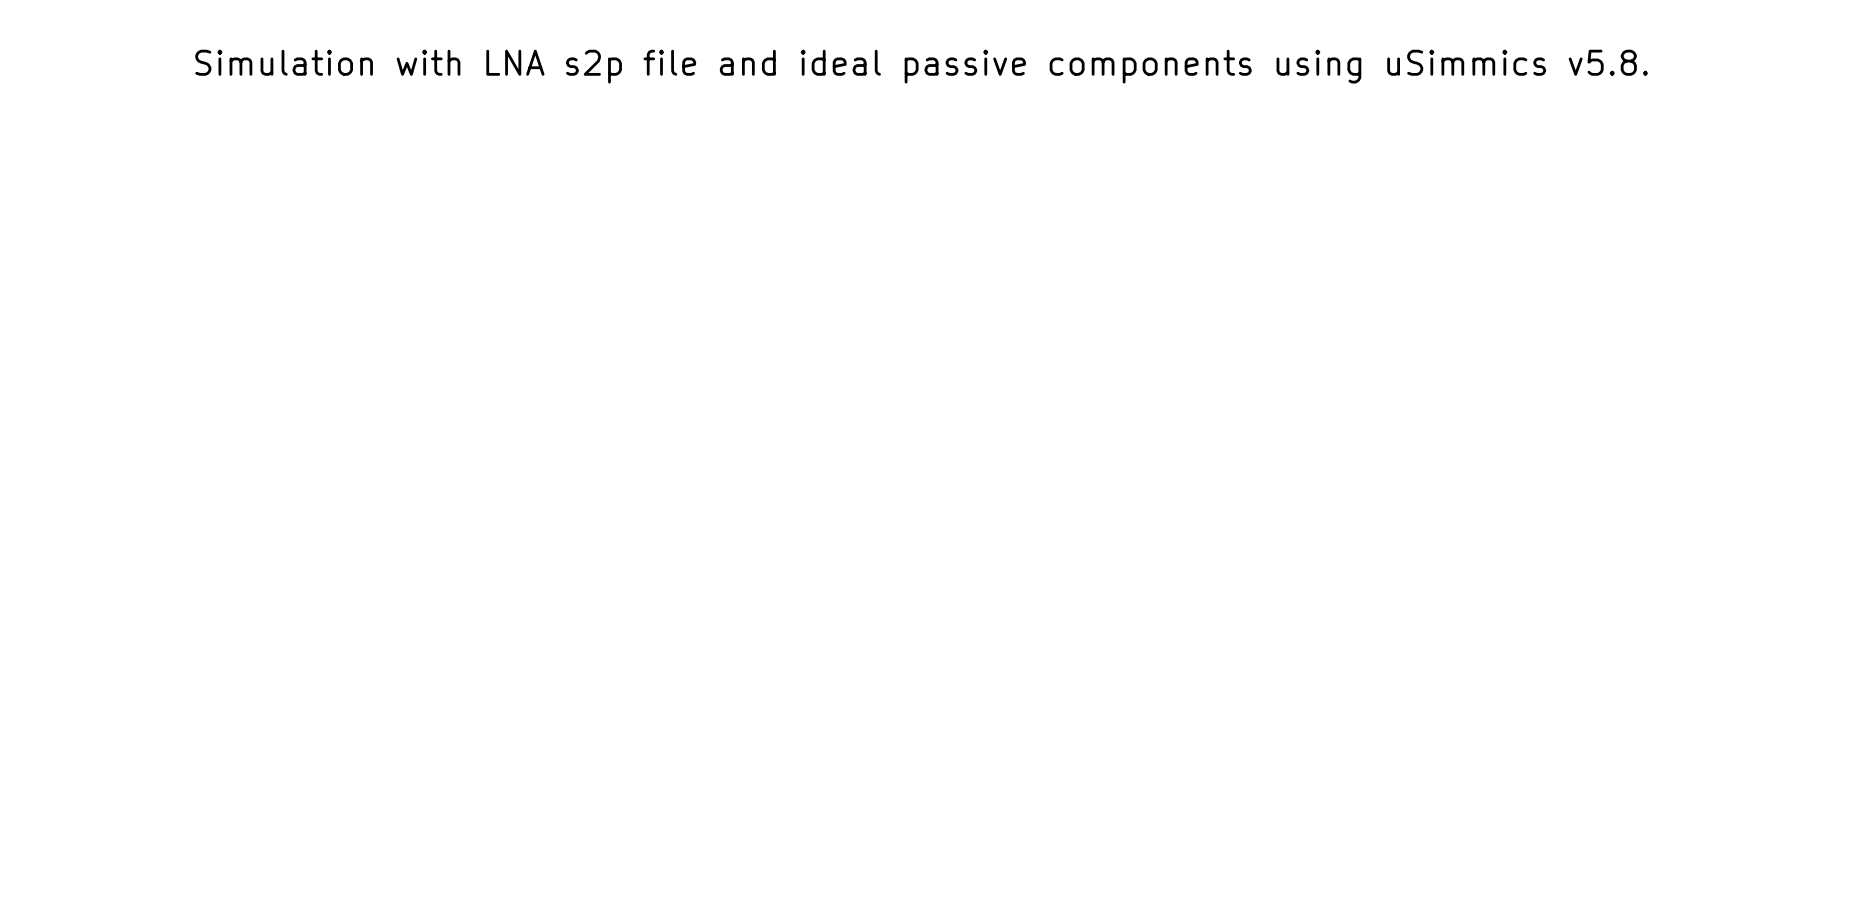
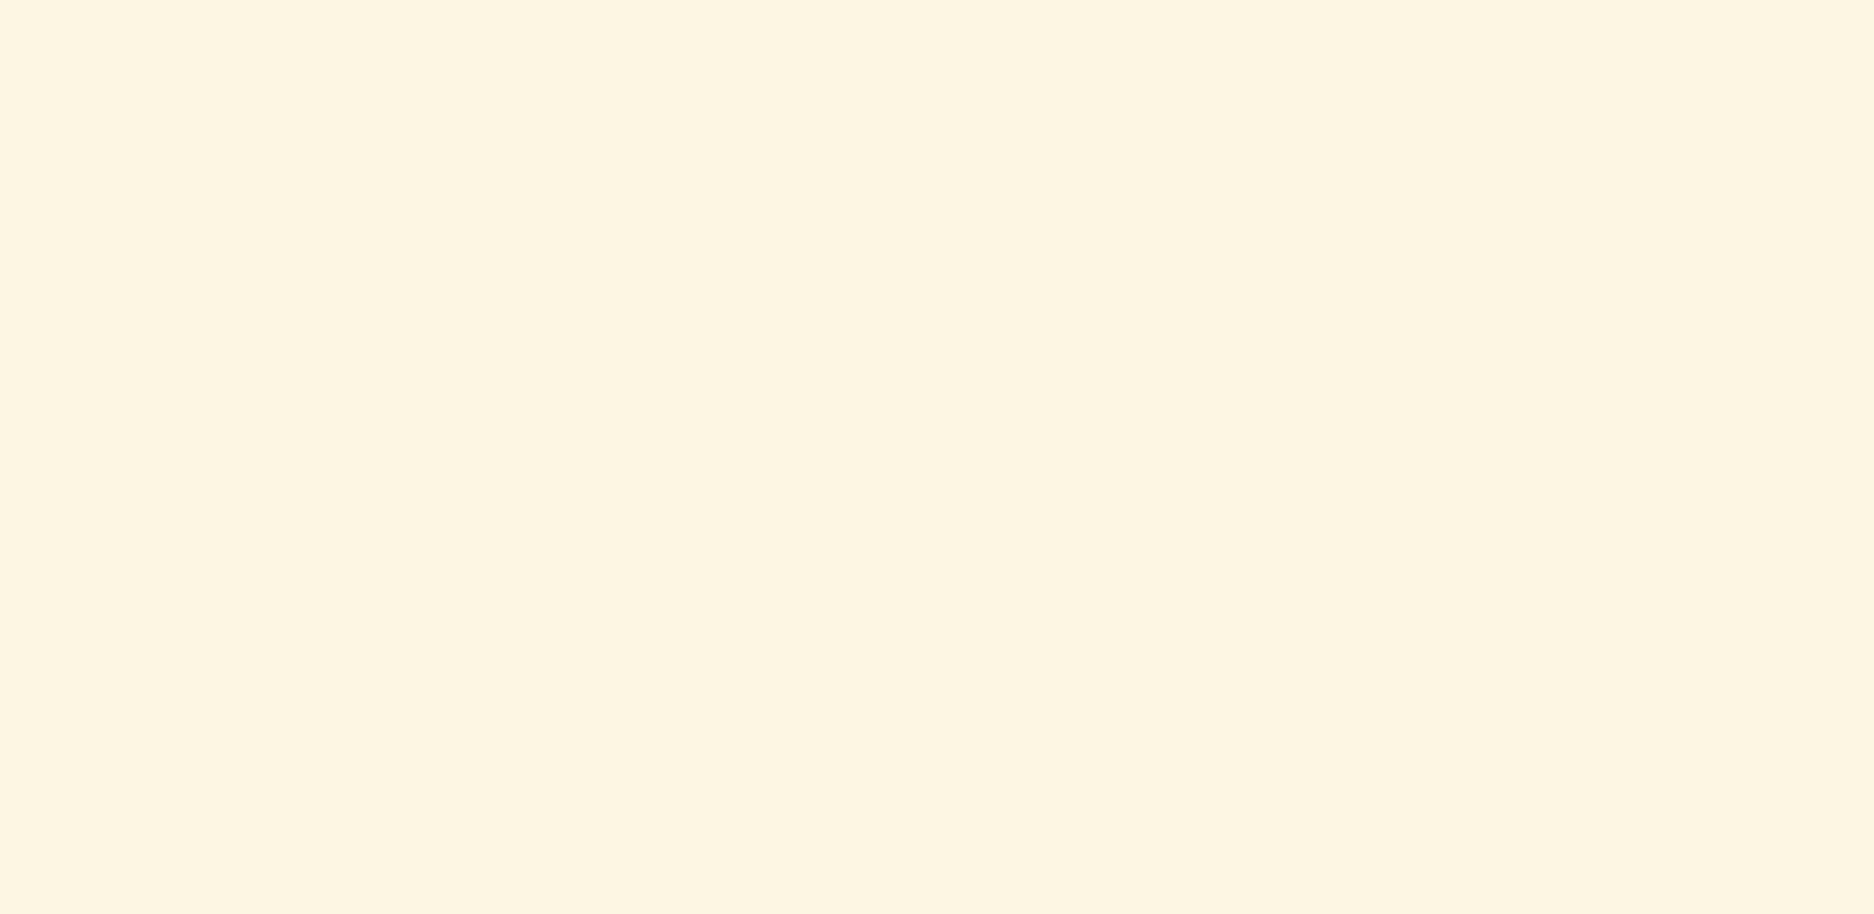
text: Simulation with LNA s2p file and ideal passive components using uSimmics v5.8. (921, 66) -> none

